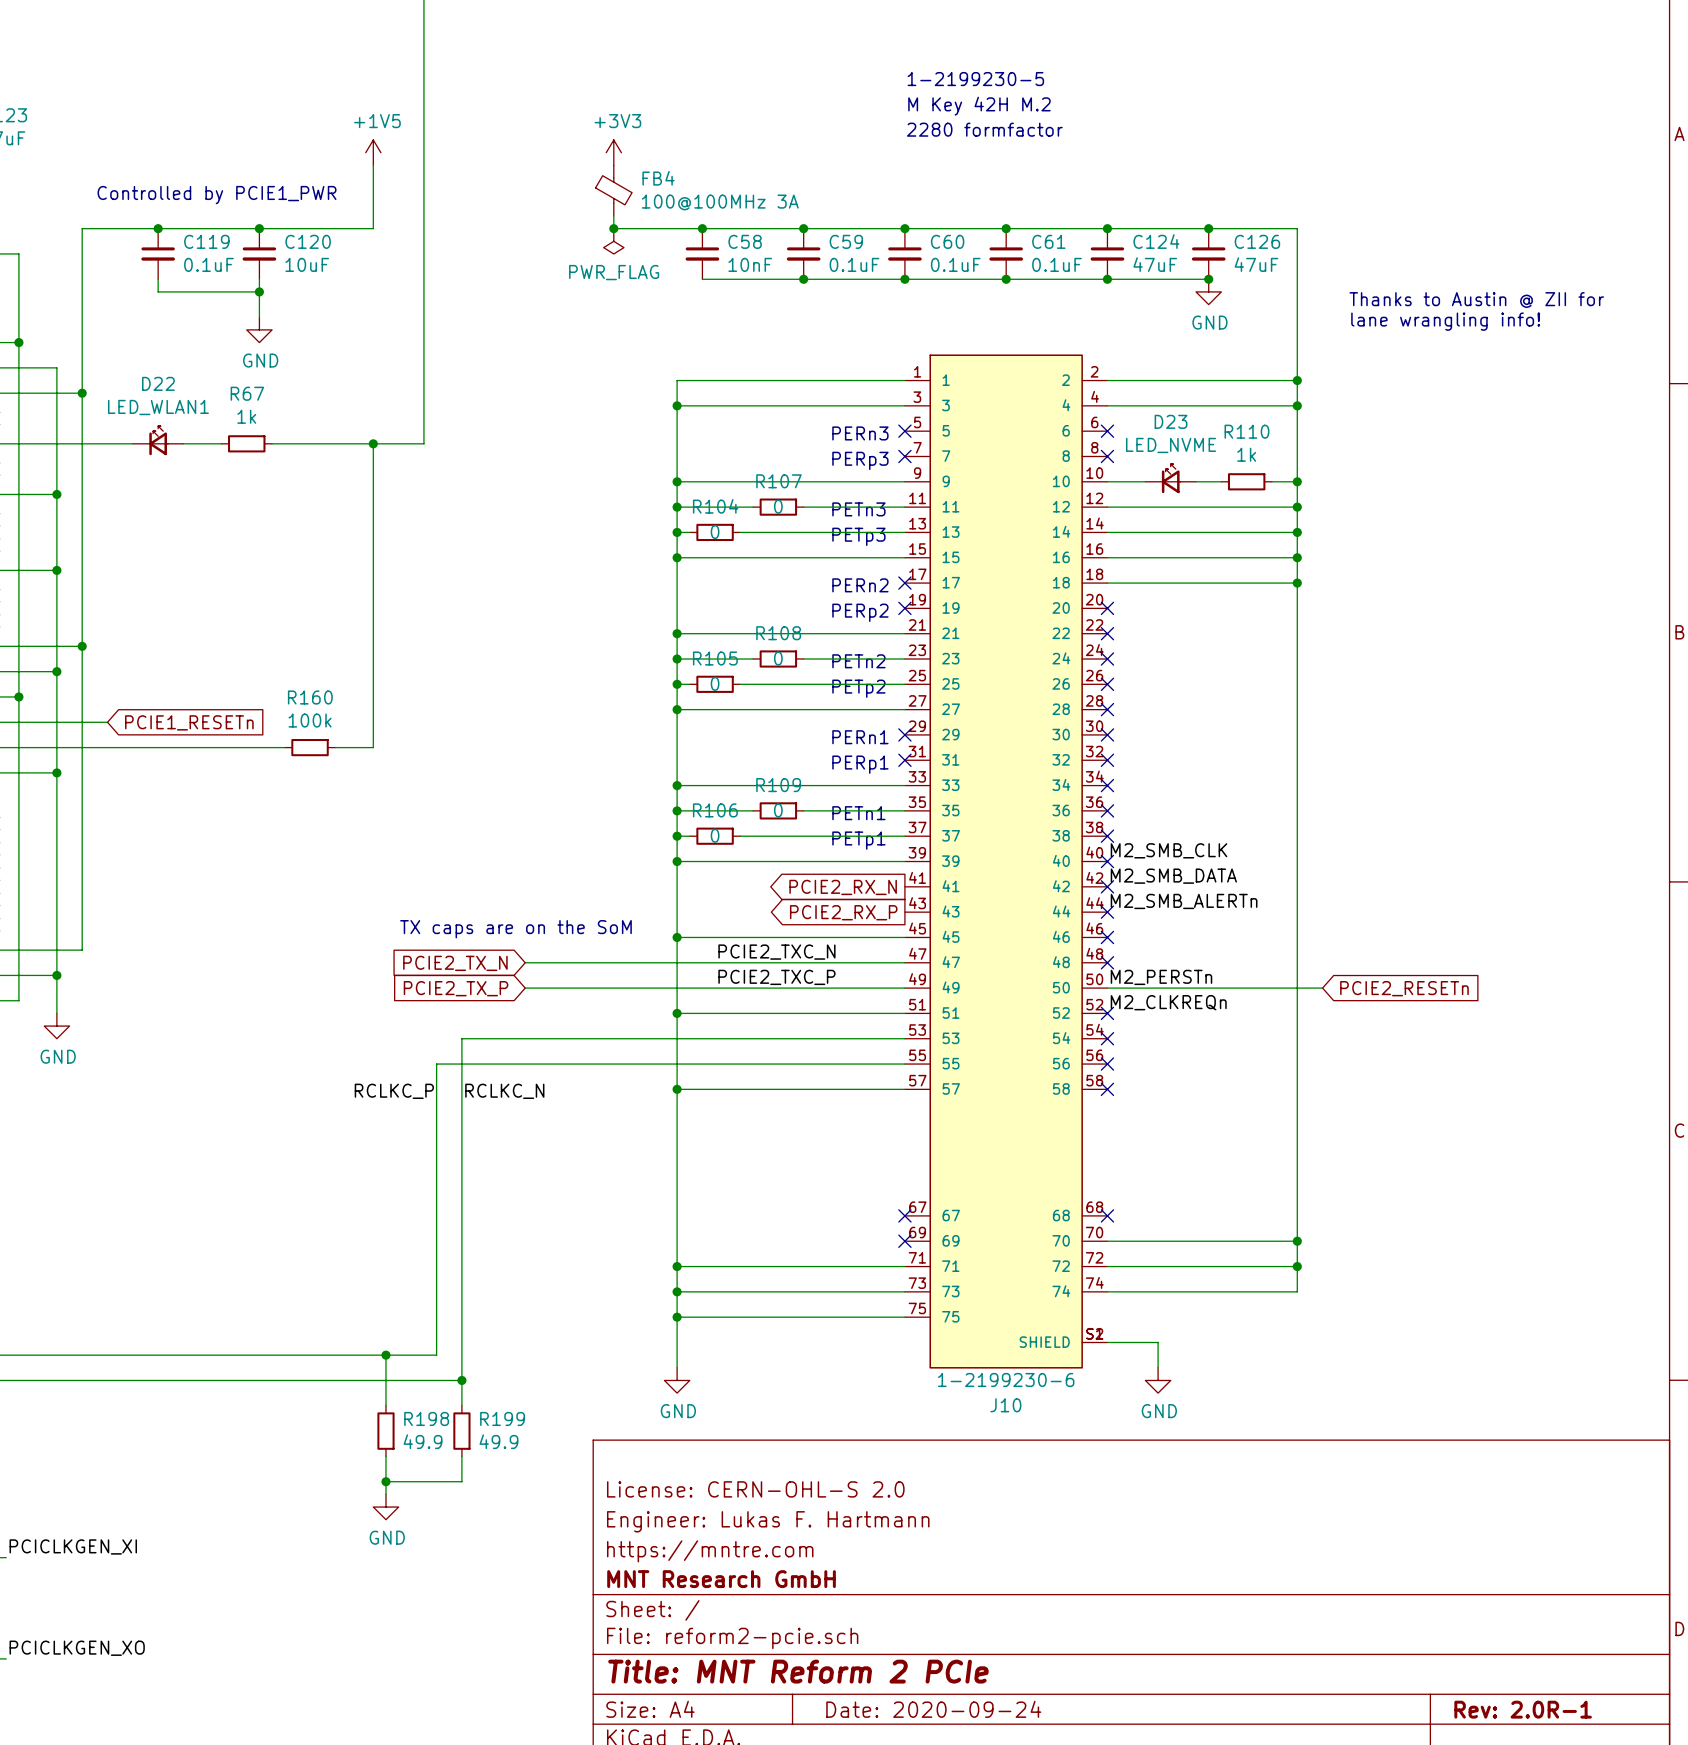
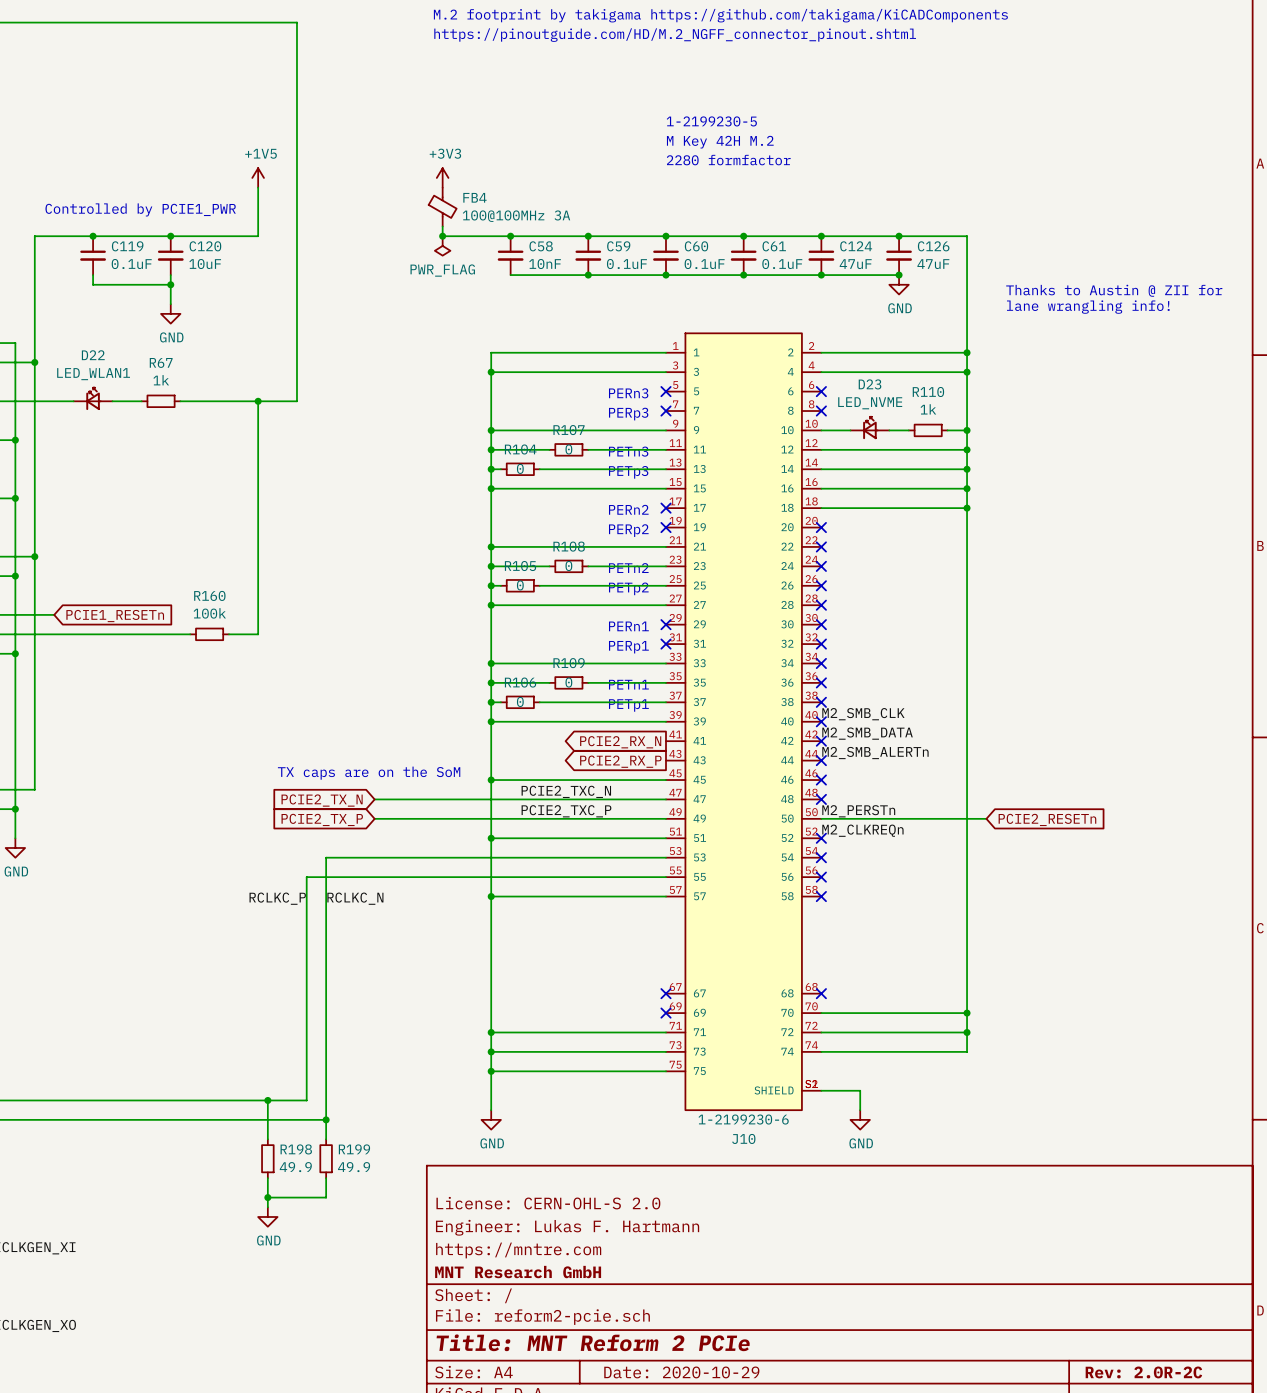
title block: Date: 2020-09-24 (933, 1709) -> Date: 2020-10-29 (681, 1372)
title block: Rev: 2.0R-1 (1523, 1709) -> Rev: 2.0R-2C (1143, 1372)

